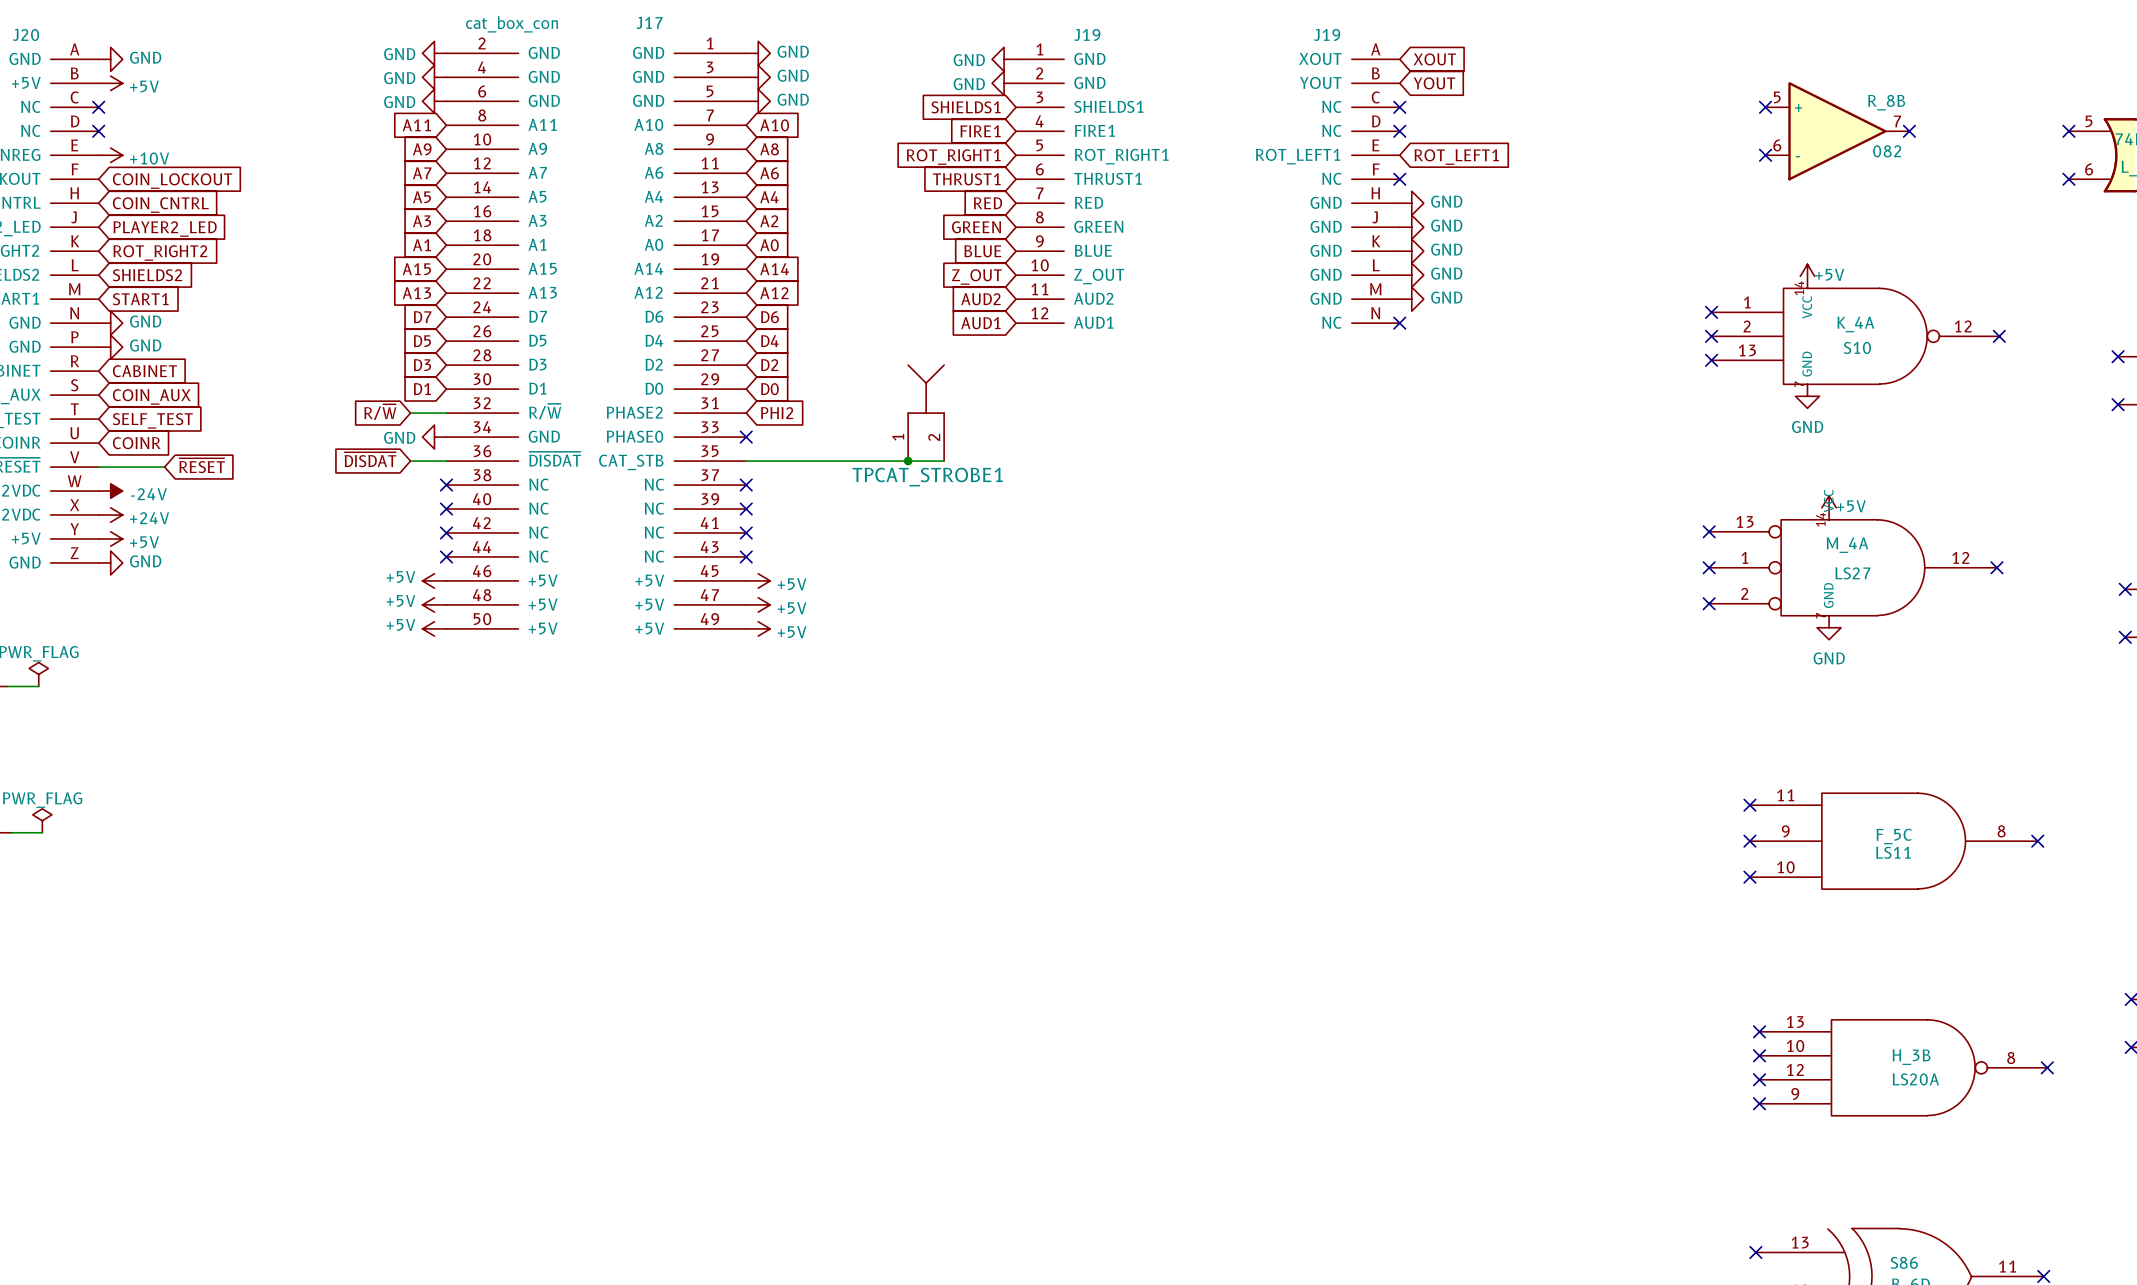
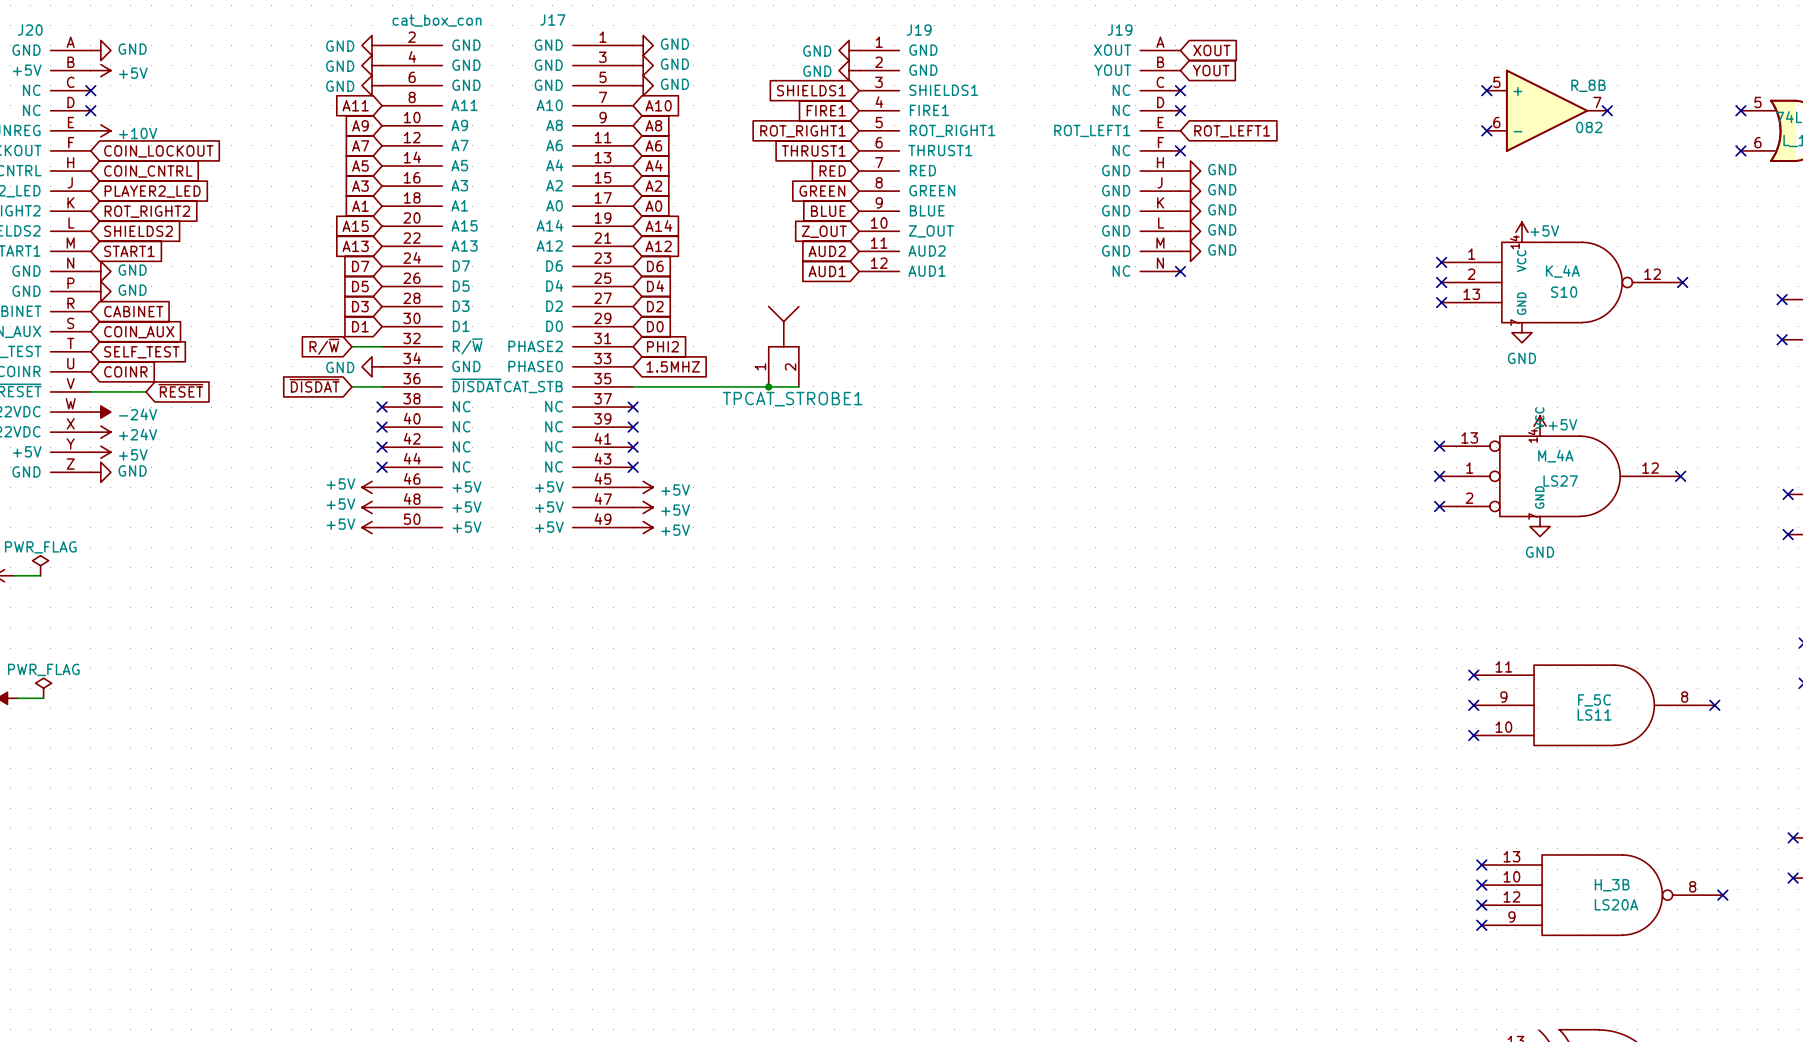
no-connect mark: (746, 437) -> none
global label: none -> 1.5MHZ (673, 366)

